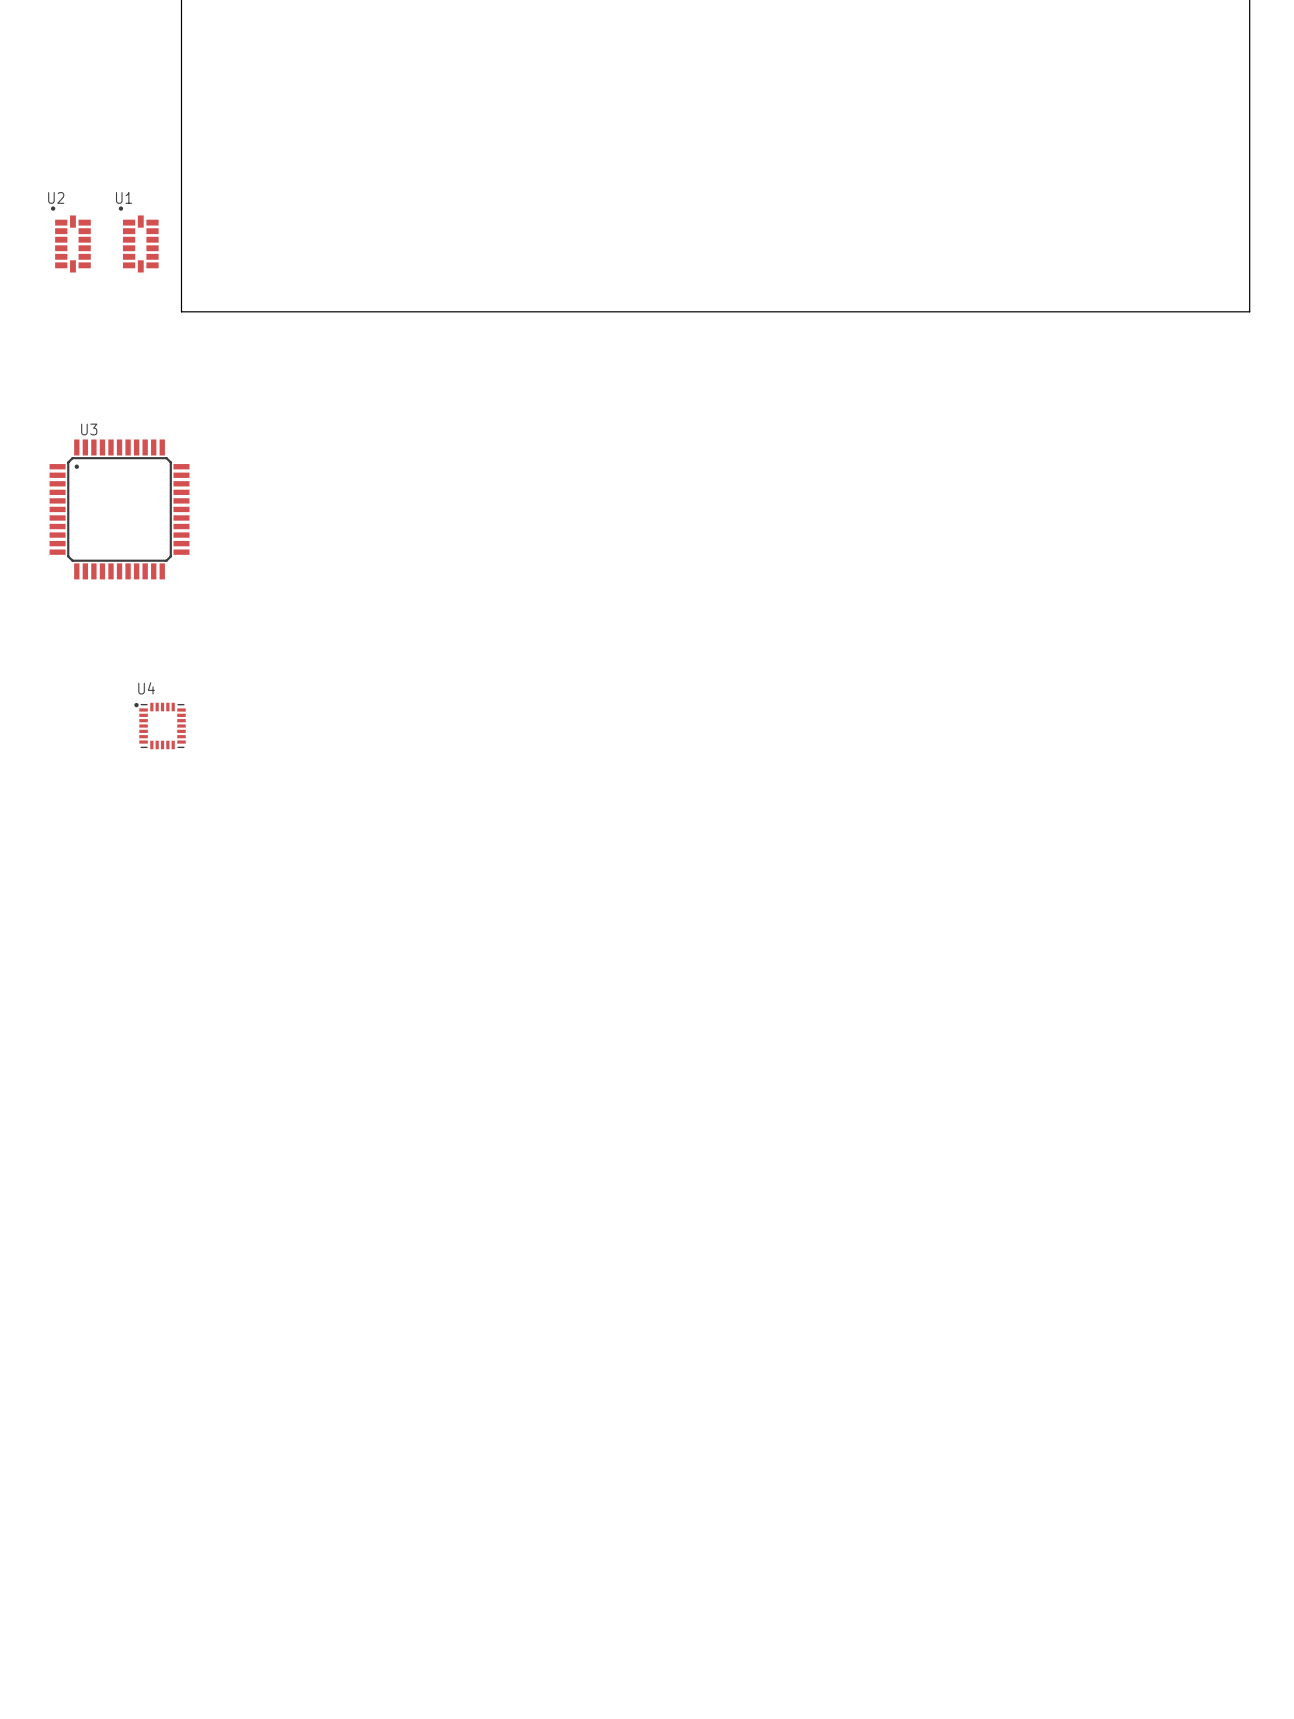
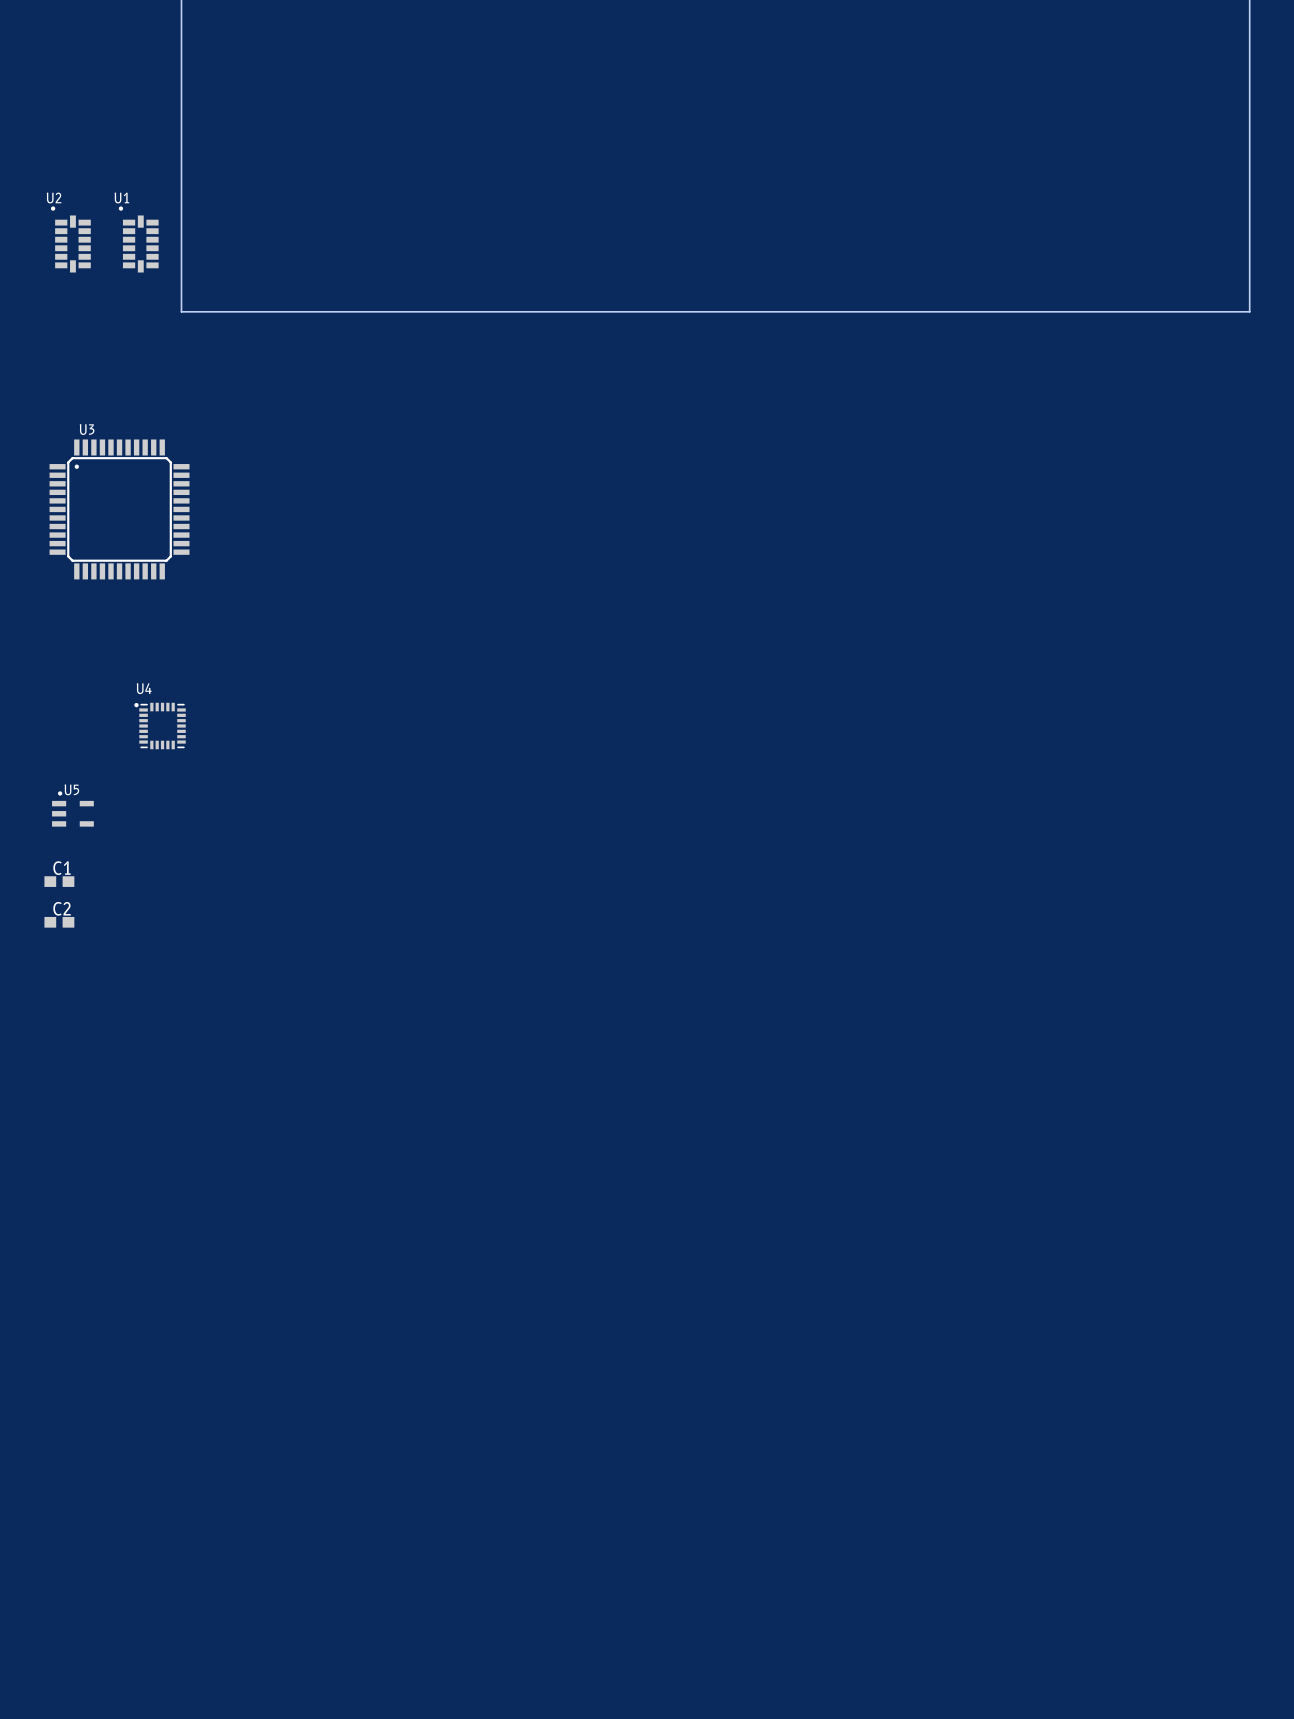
U5: none -> (72, 808)
C1: none -> (59, 881)
C2: none -> (59, 922)

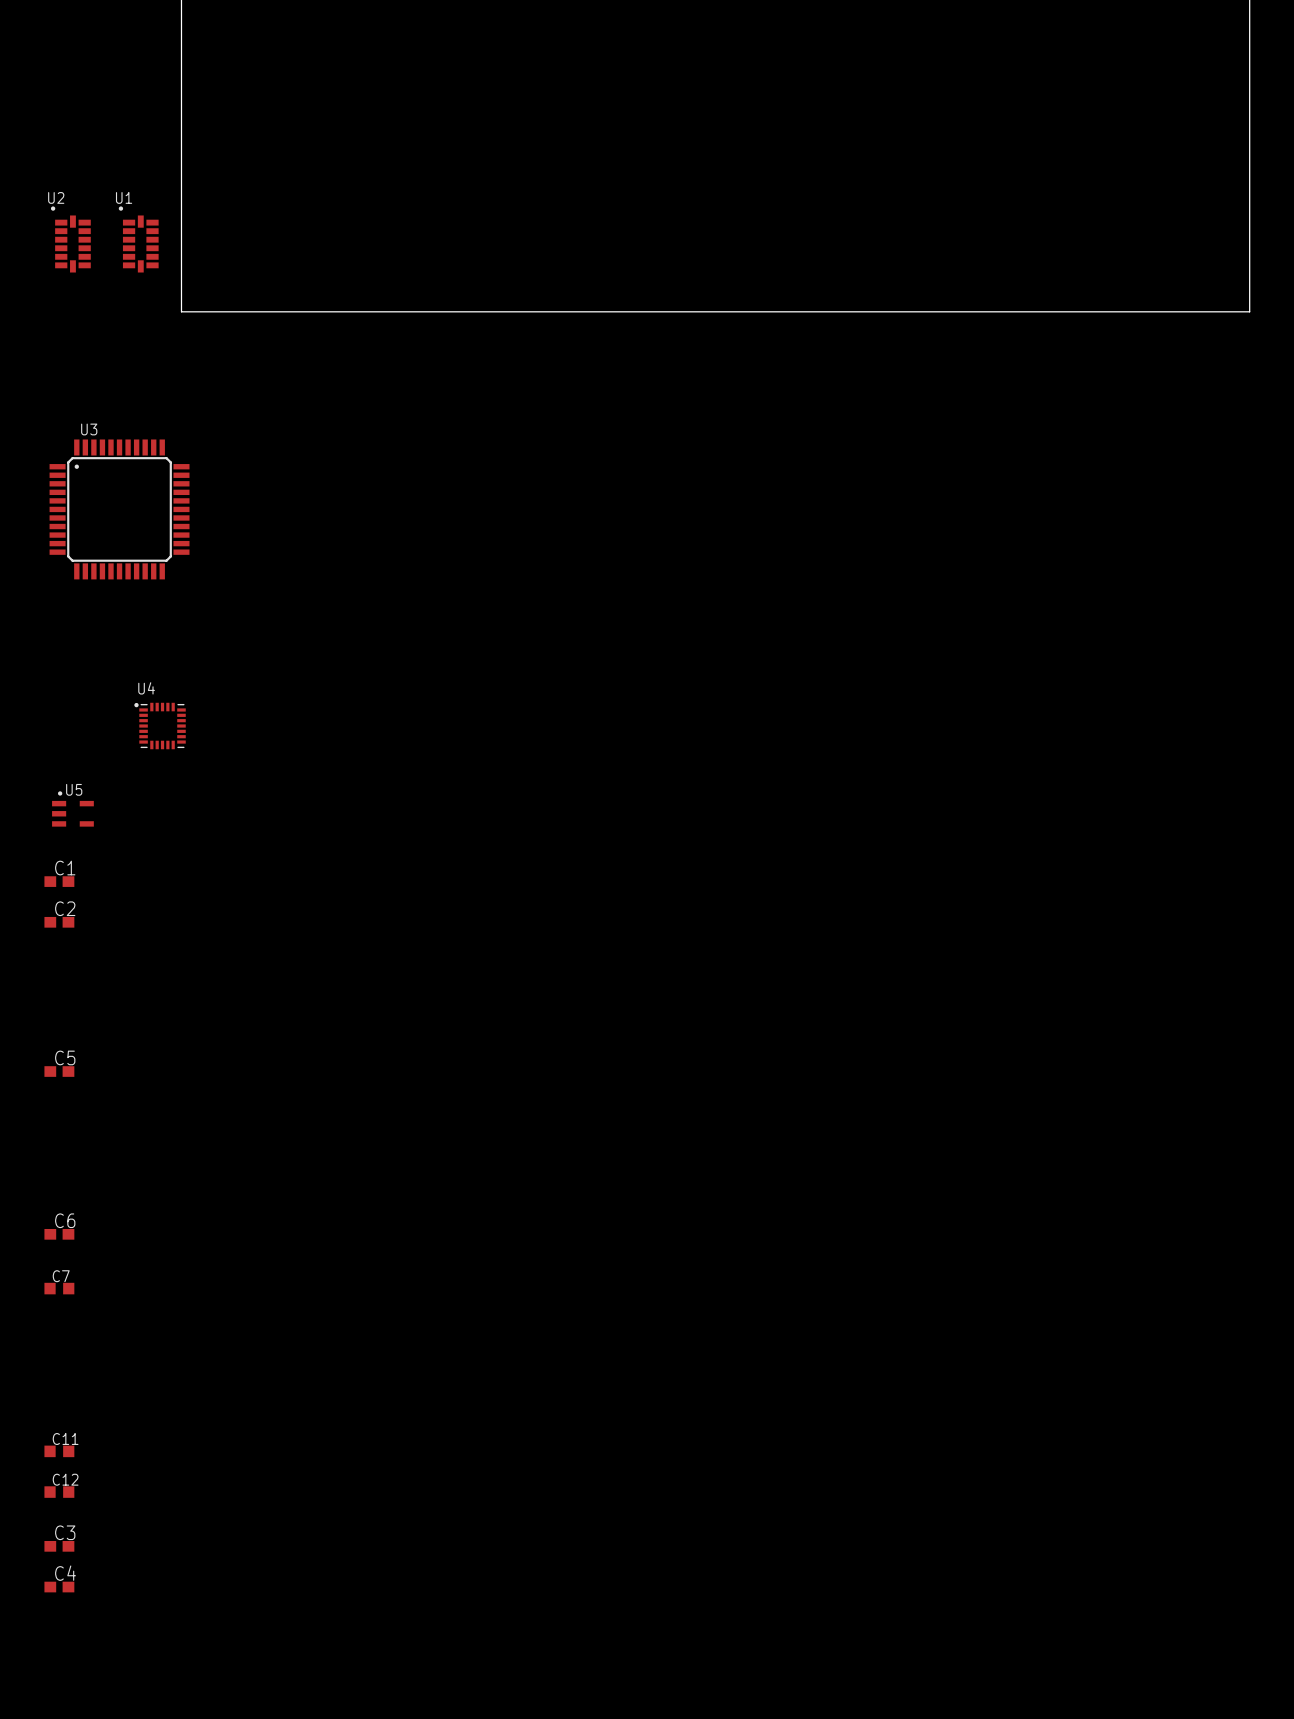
C5: none -> (59, 1071)
C6: none -> (59, 1234)
C7: none -> (59, 1288)
C11: none -> (59, 1451)
C12: none -> (59, 1492)
C3: none -> (59, 1546)
C4: none -> (59, 1587)

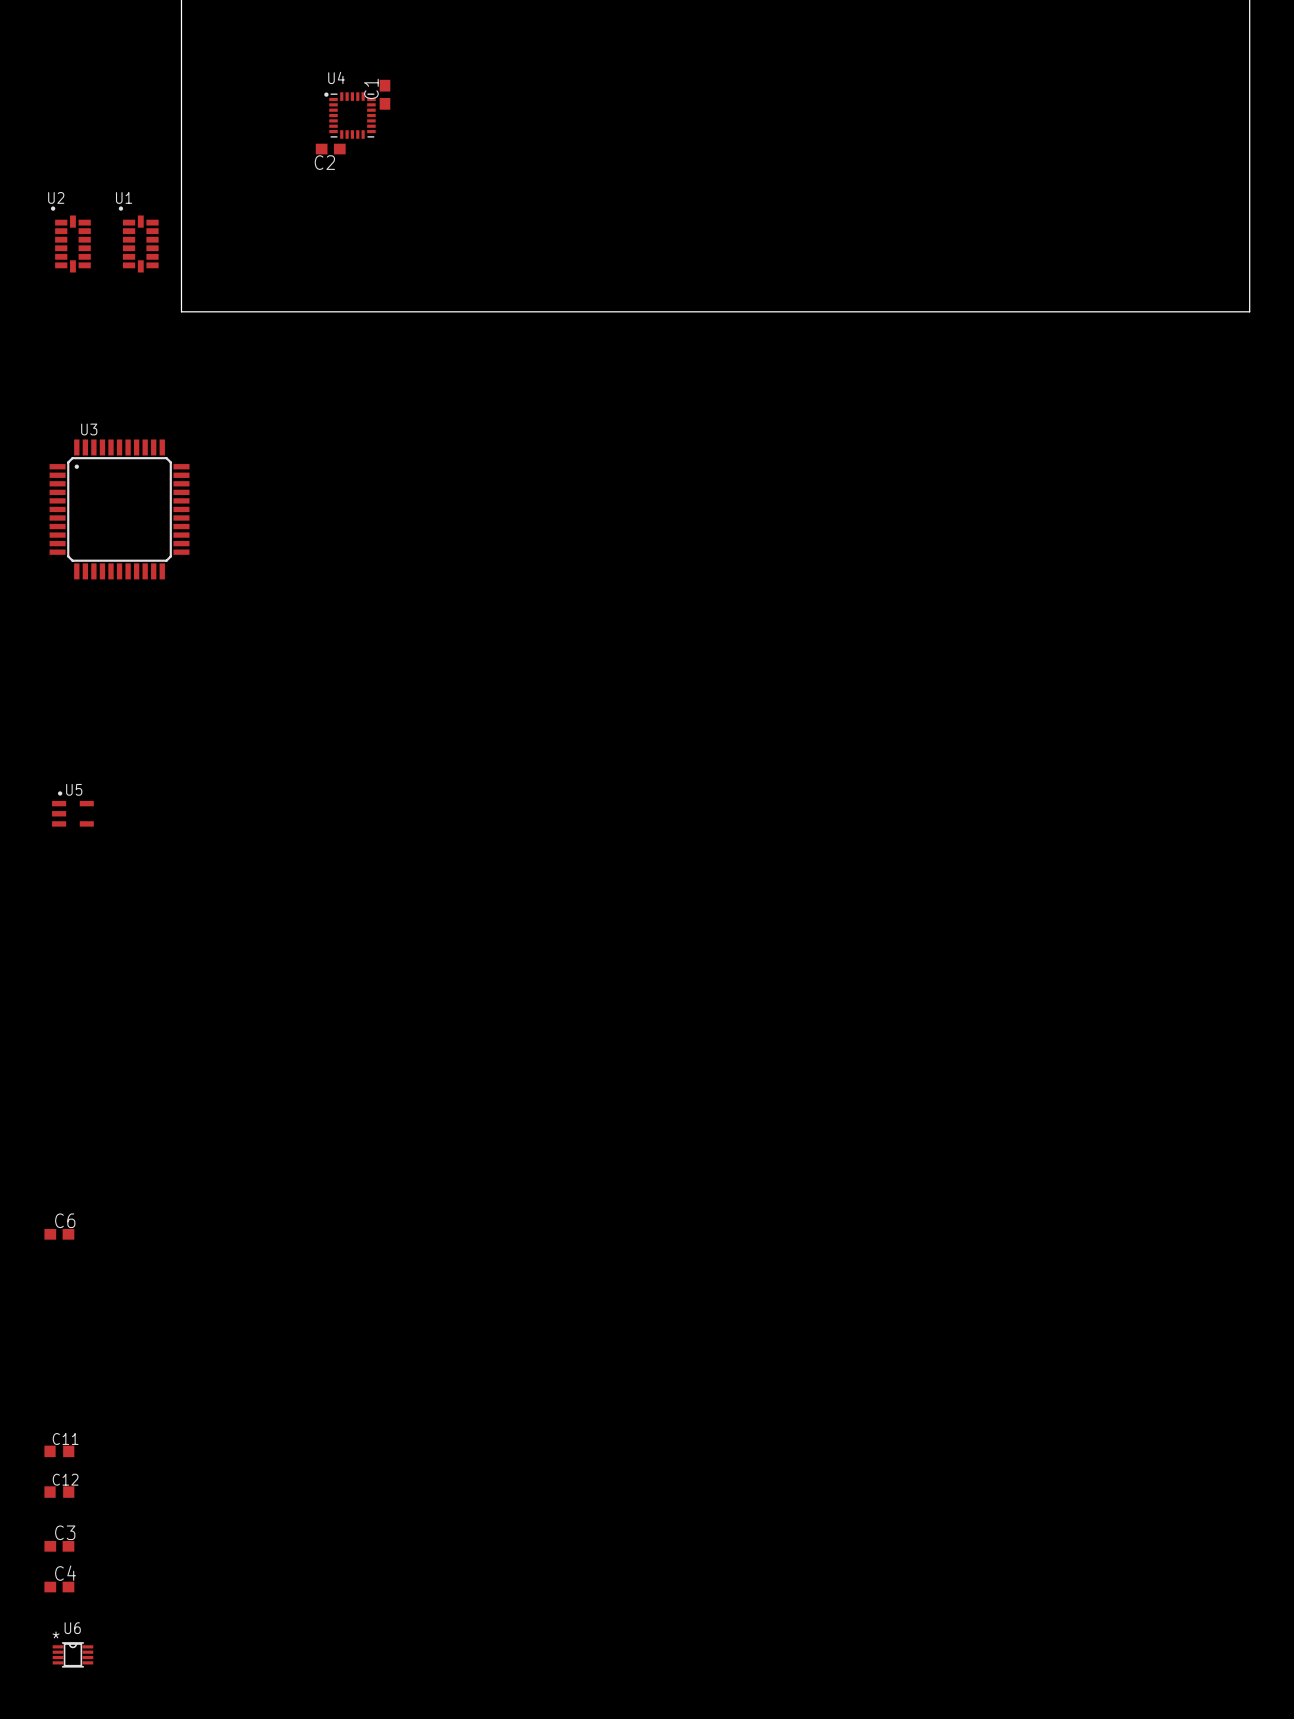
U4 position: (160, 726) -> (349, 115)
C1 name position: C1 (65, 868) -> C1 (371, 88)
C1 rotation: 0° (59, 881) -> 90° clockwise (384, 94)
C1 position: (59, 881) -> (384, 94)
C2 name position: C2 (65, 908) -> C2 (324, 162)
C2 position: (59, 922) -> (330, 149)
C5: (59, 1071) -> none
C7: (59, 1288) -> none
U6: none -> (72, 1654)

